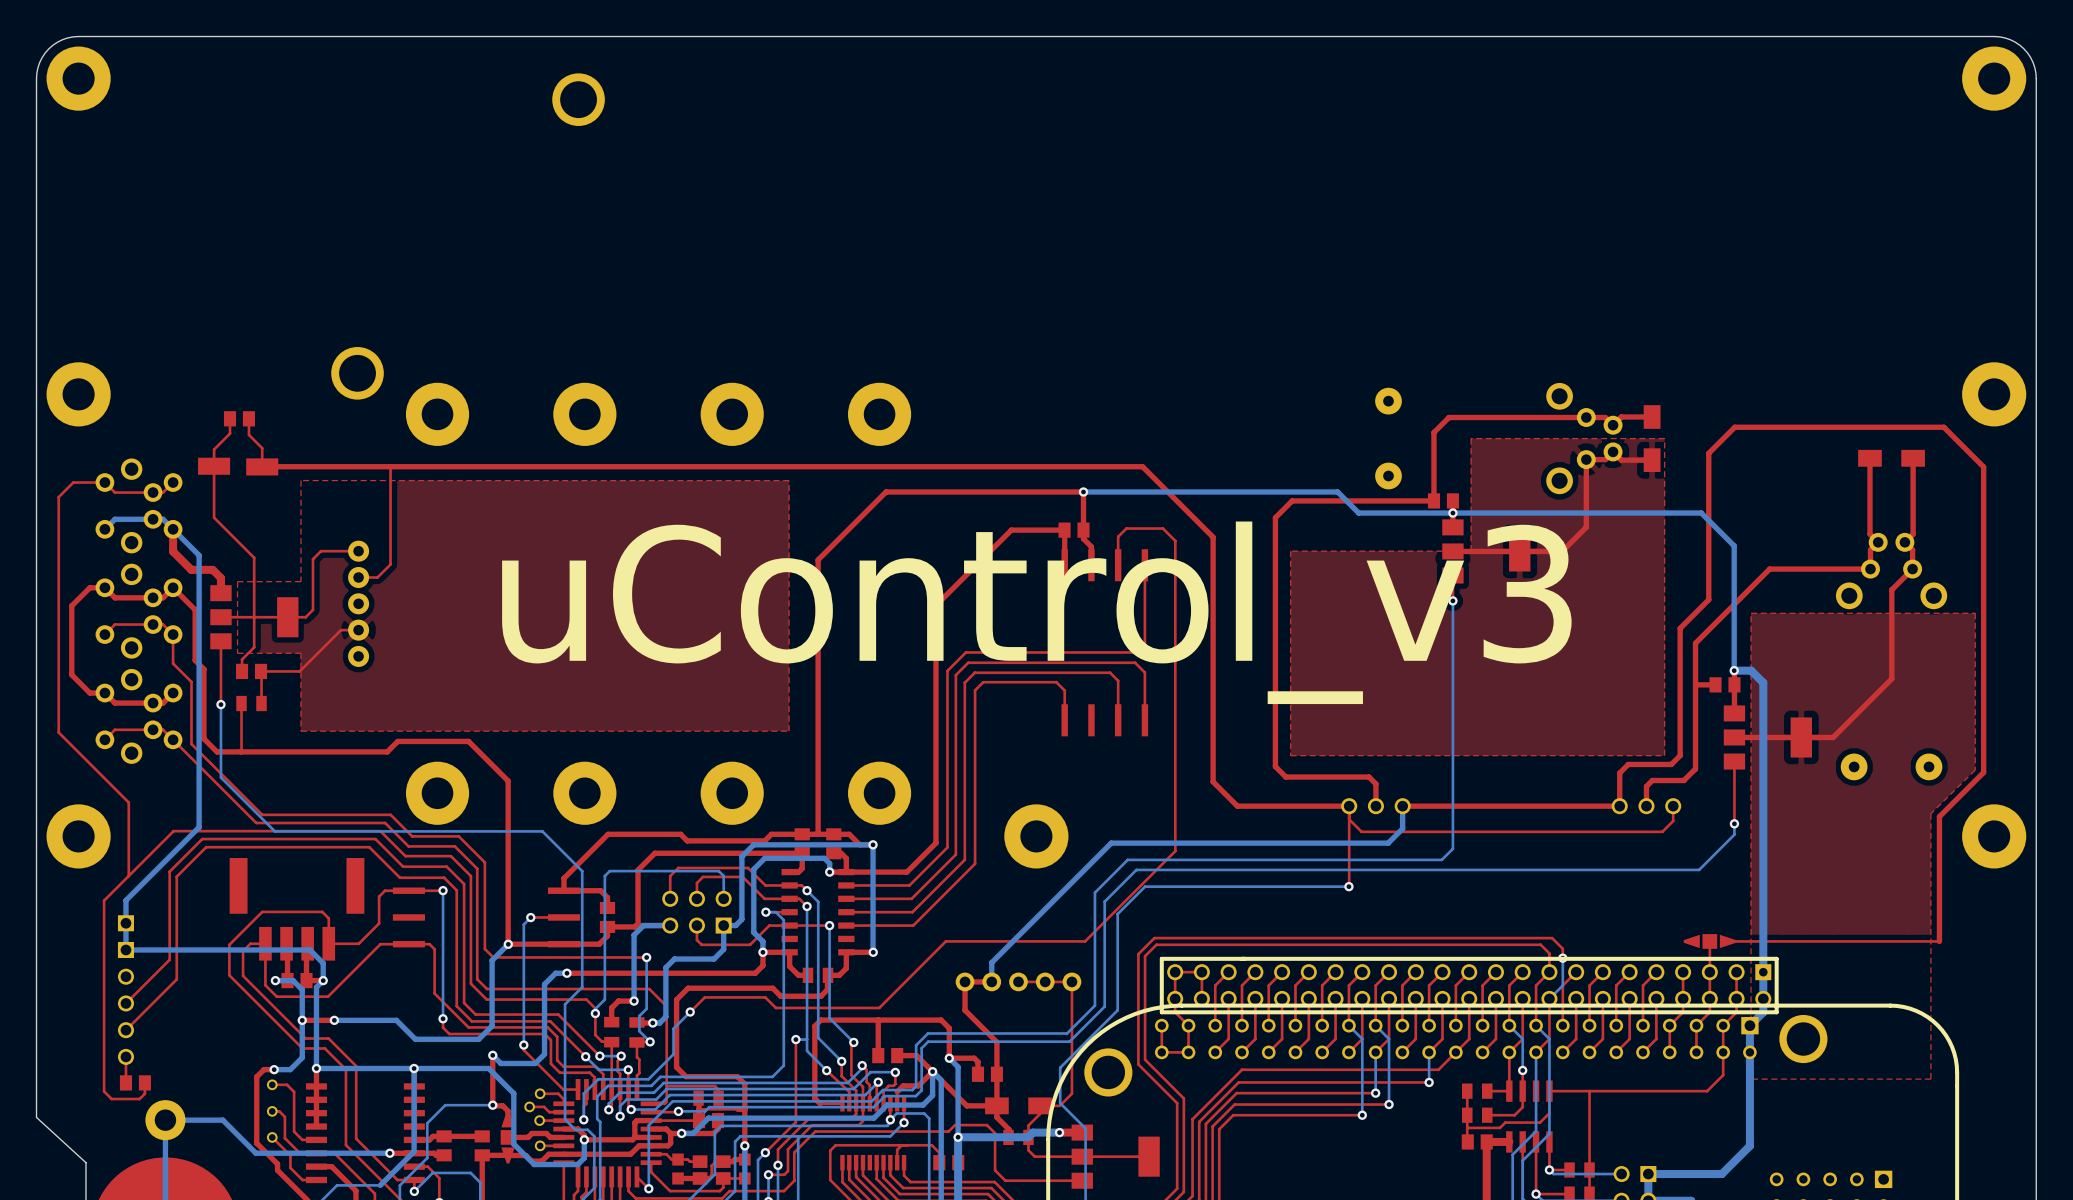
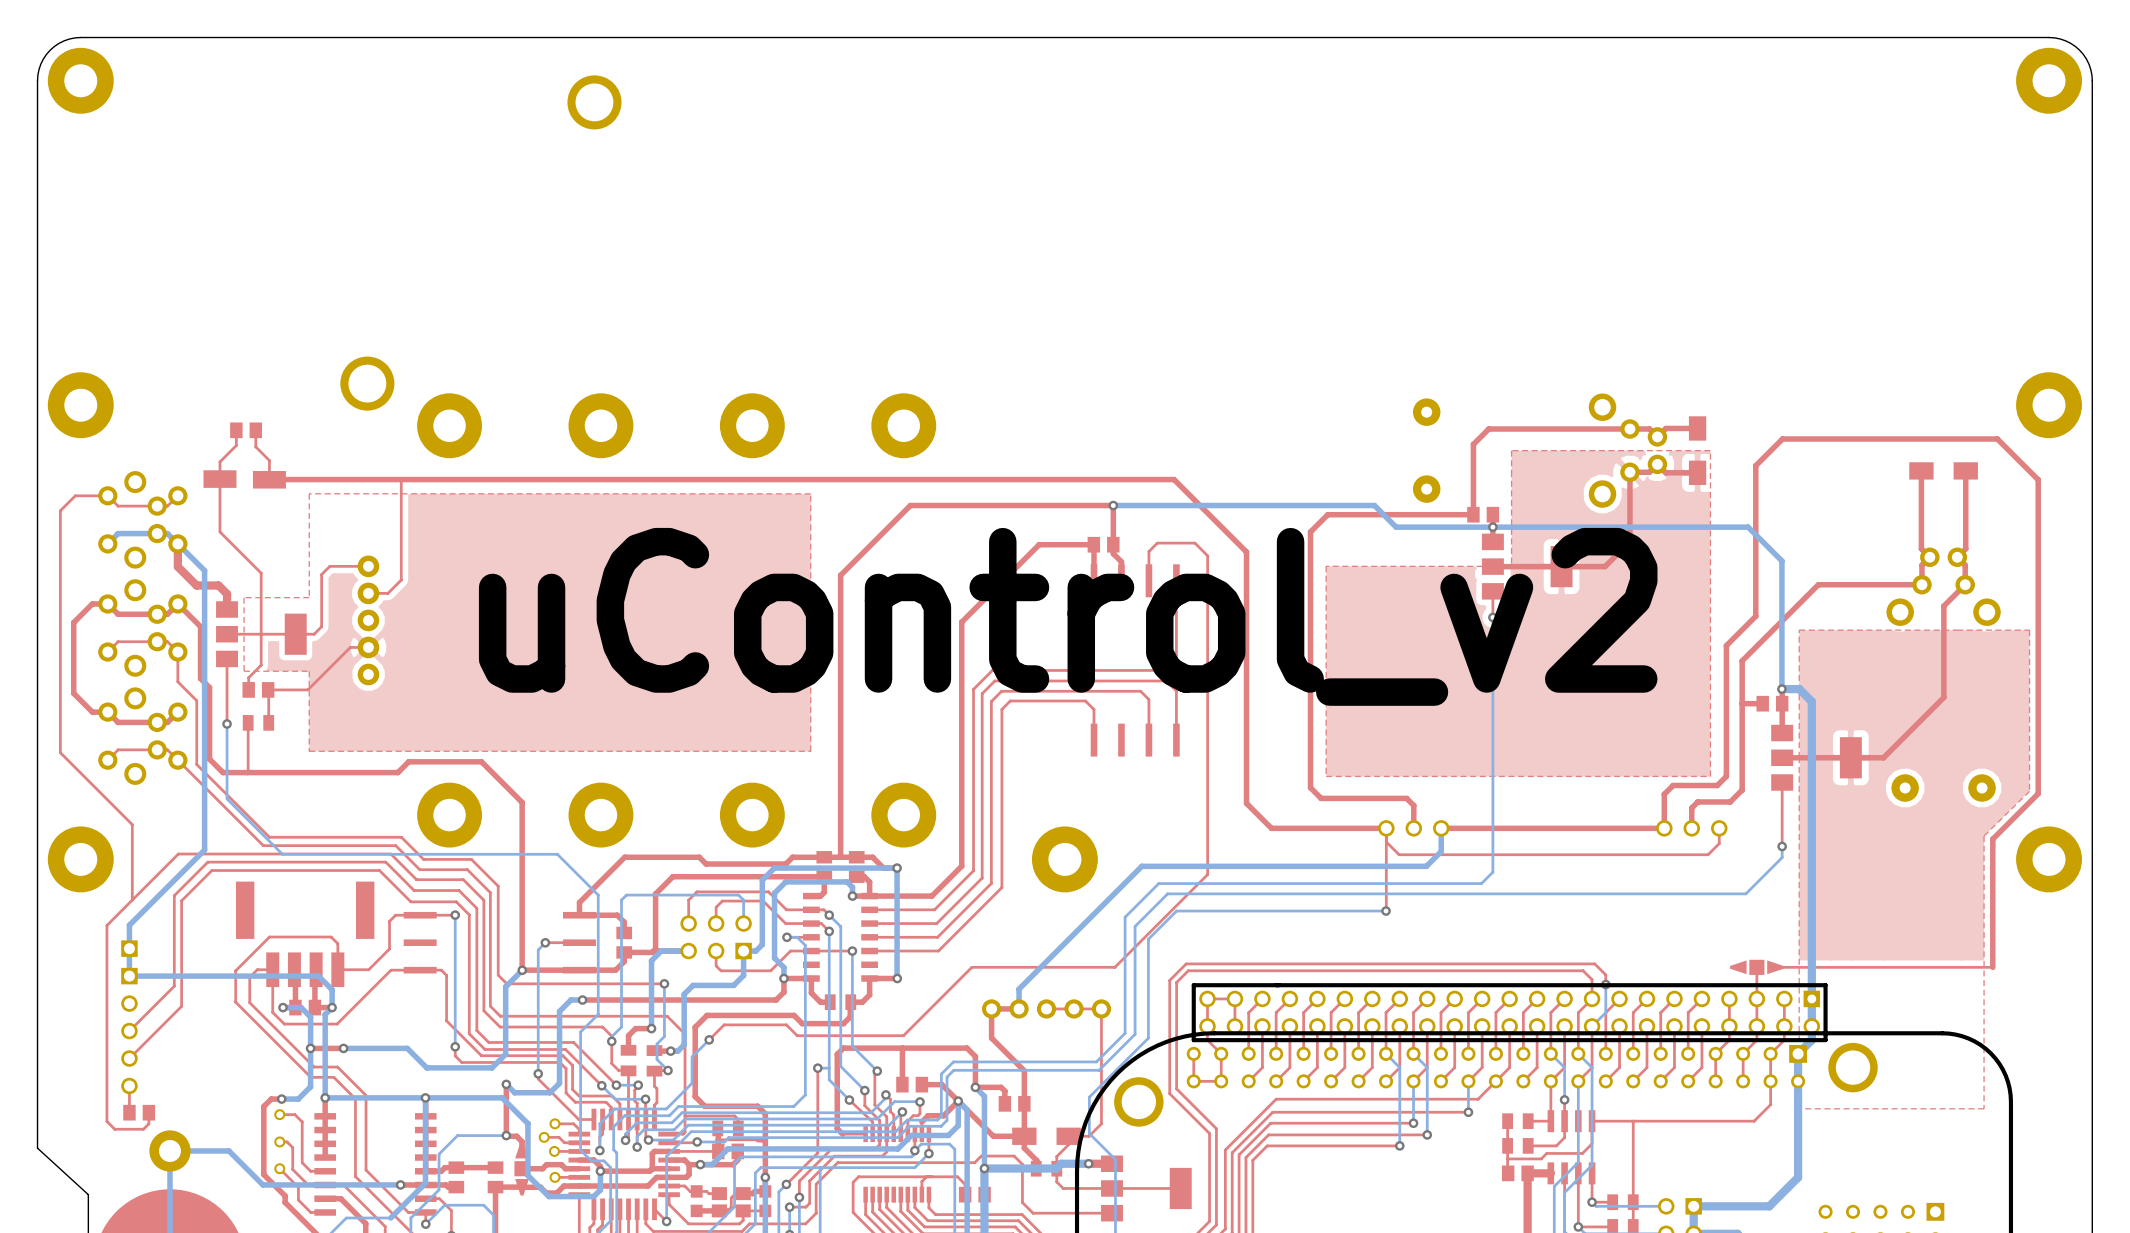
text: uControl_v3 (1036, 612) -> uControl_v2 (1068, 616)

